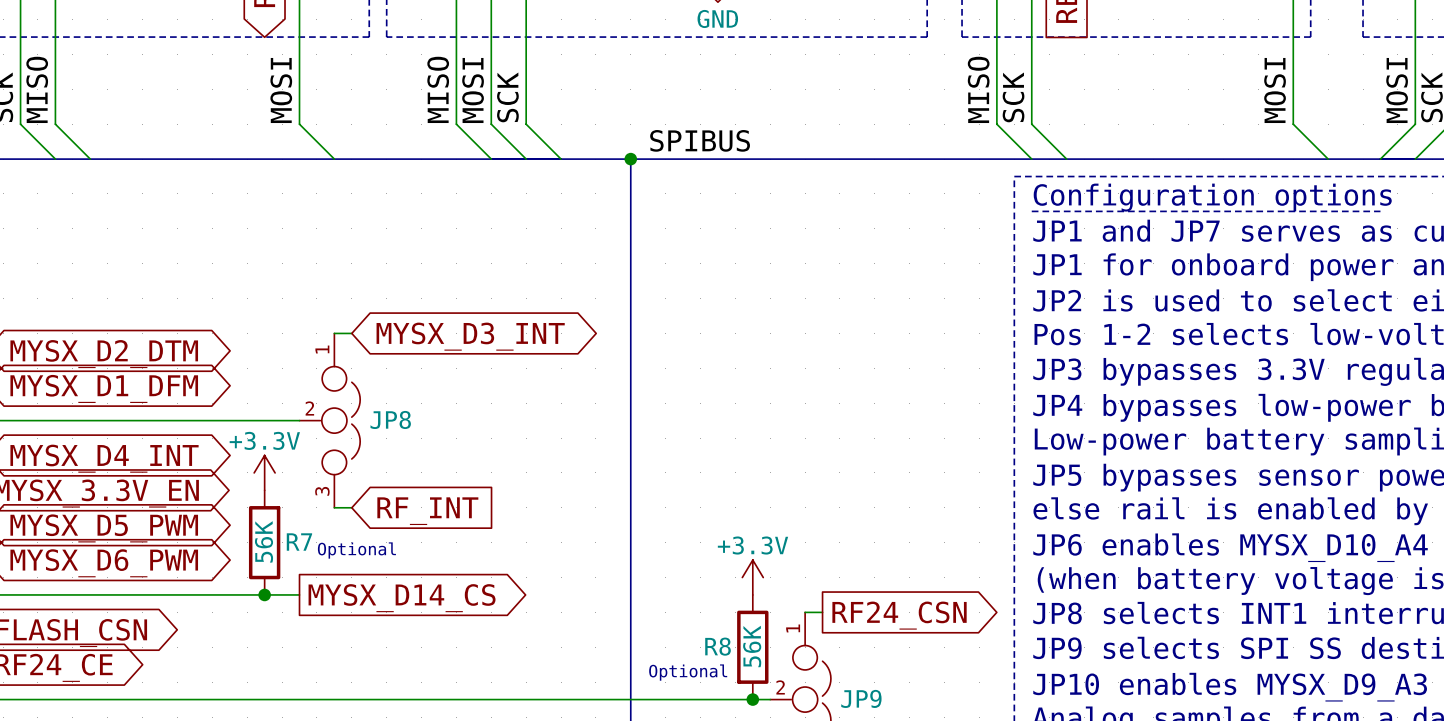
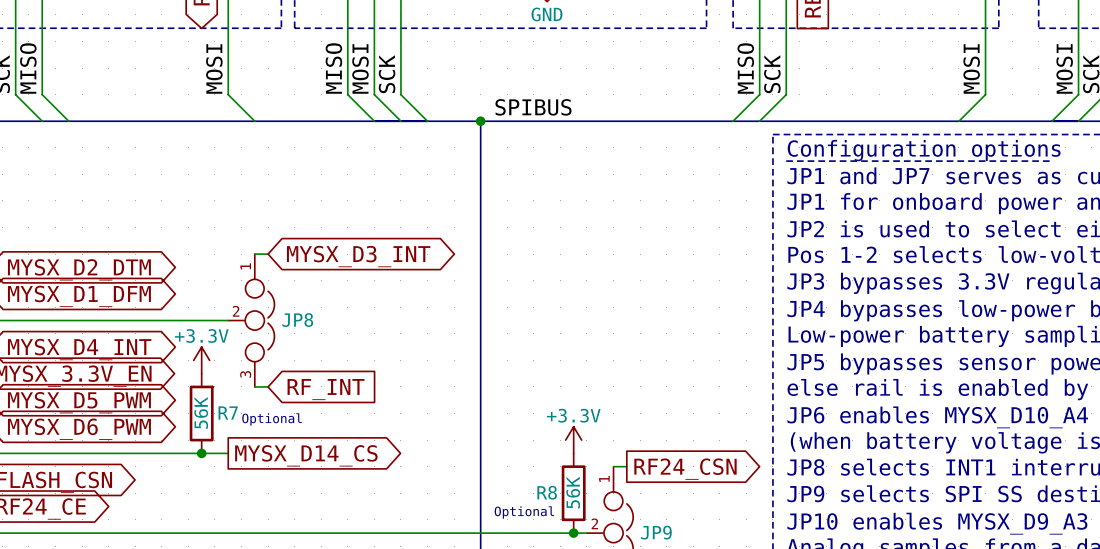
wire: (996, 124) (1031, 159) -> (759, 94) (733, 121)
wire: (1031, 124) (1066, 159) -> (786, 94) (759, 121)
wire: (1293, 124) (1328, 159) -> (985, 94) (958, 121)

